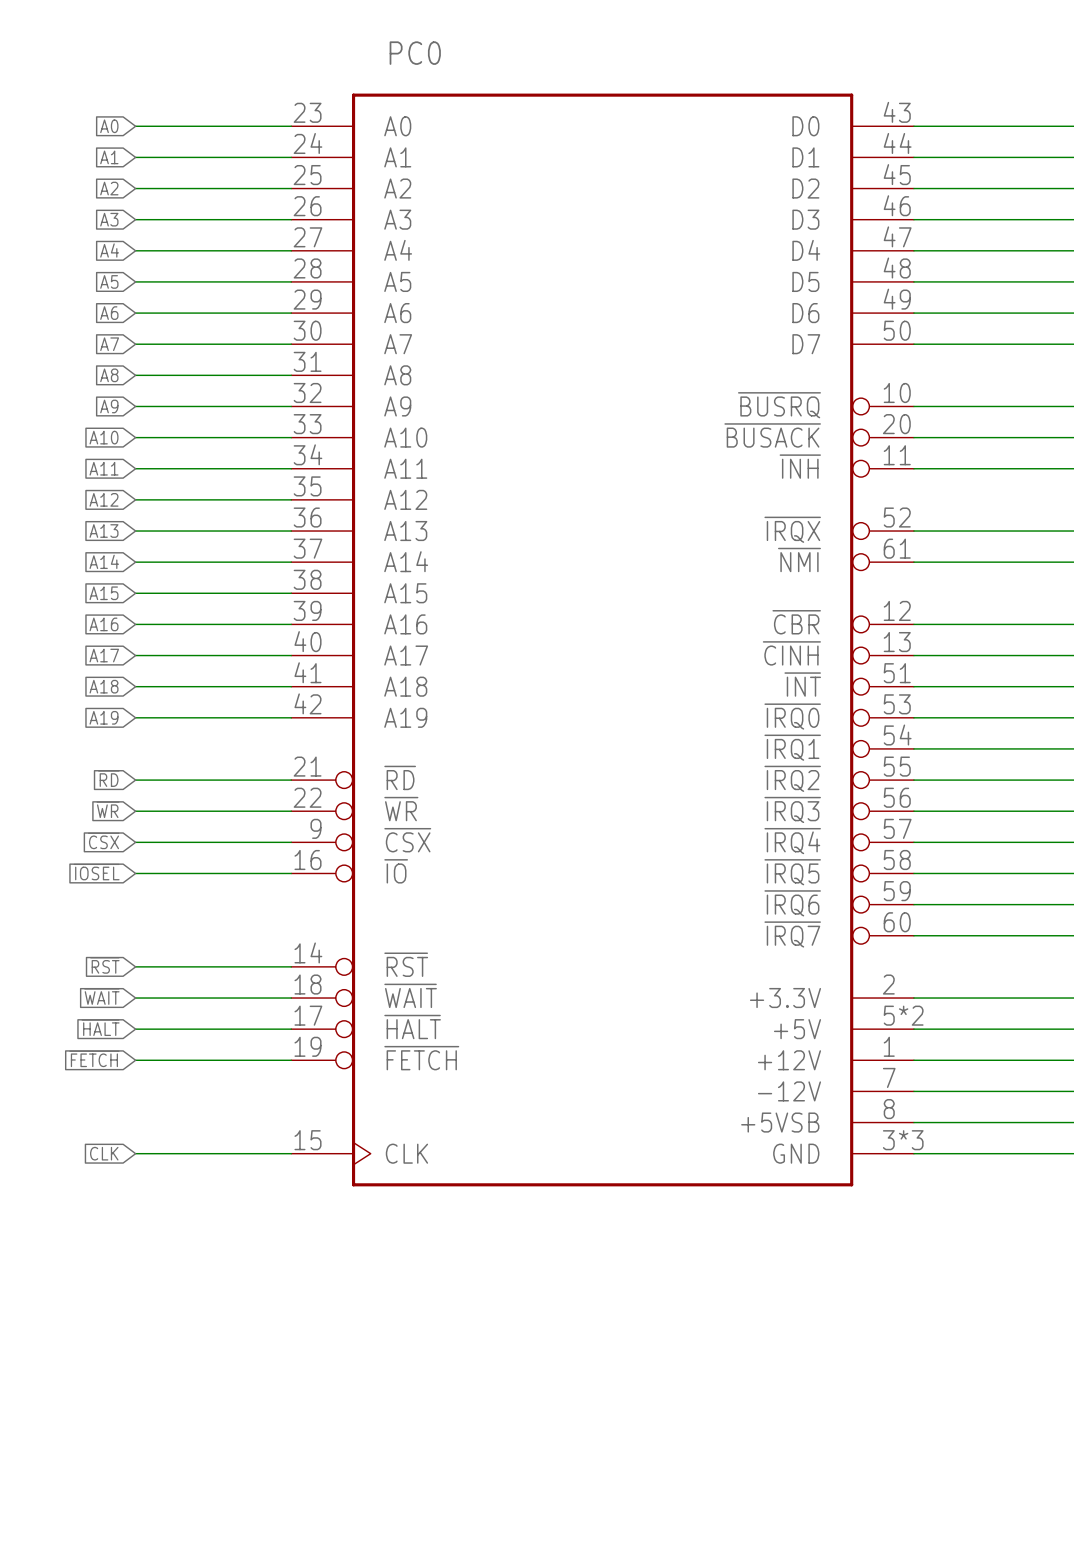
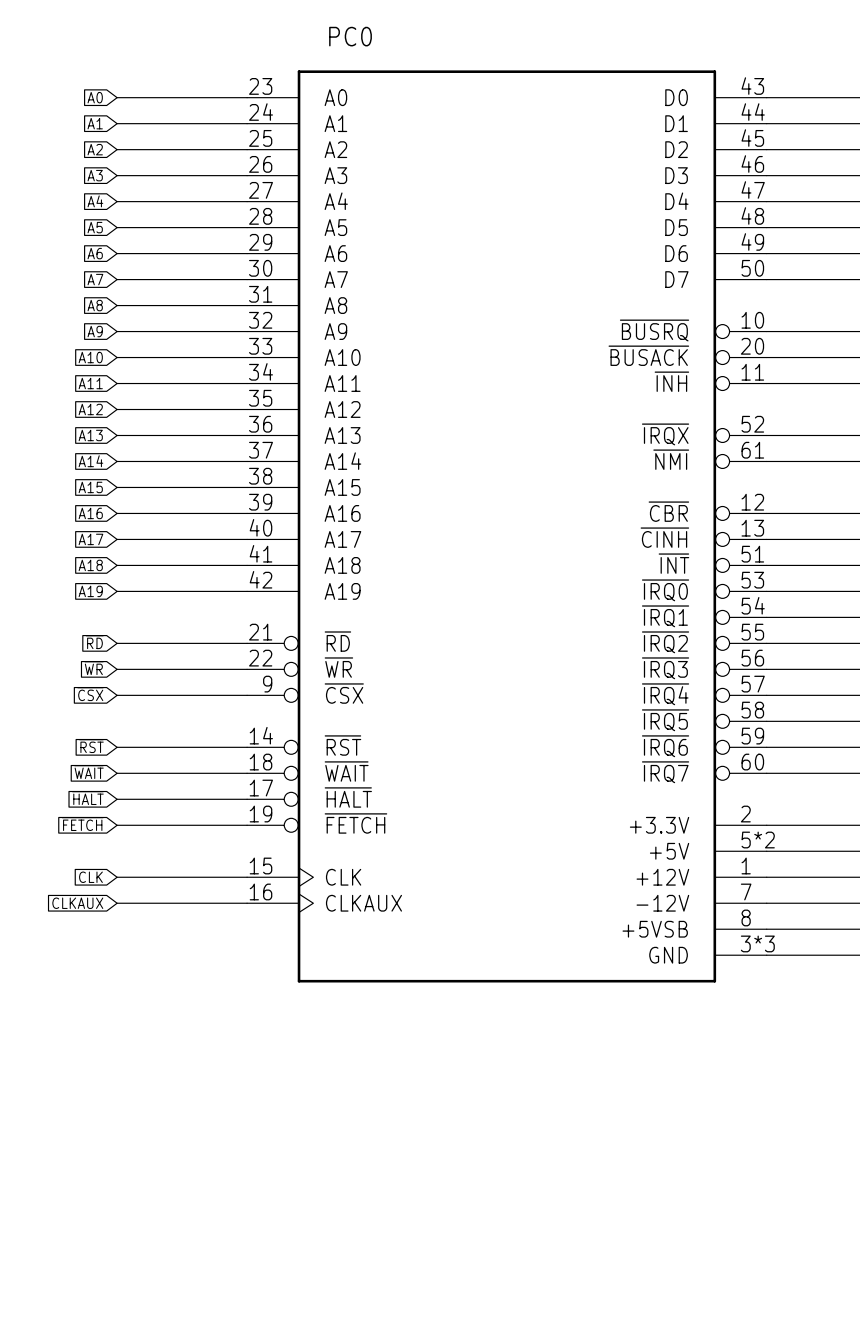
PC0 symbol: [291, 93, 914, 1187] -> [247, 70, 767, 983]
global label: ~{IOSEL} (96, 872) -> none
wire: (135, 873) (291, 873) -> (117, 773) (247, 773)
global label: none -> ~{RST} (91, 746)
global label: none -> ~{WAIT} (88, 772)
global label: ~{RST} (104, 965) -> ~{HALT} (87, 798)
global label: ~{WAIT} (101, 996) -> ~{FETCH} (82, 824)
global label: ~{HALT} (100, 1027) -> none
wire: (135, 1029) (291, 1029) -> (117, 903) (247, 903)
global label: ~{FETCH} (94, 1058) -> CLK (90, 877)
global label: none -> CLKAUX (77, 903)
global label: CLK (104, 1153) -> none
wire: (135, 1153) (291, 1153) -> (117, 747) (247, 747)

